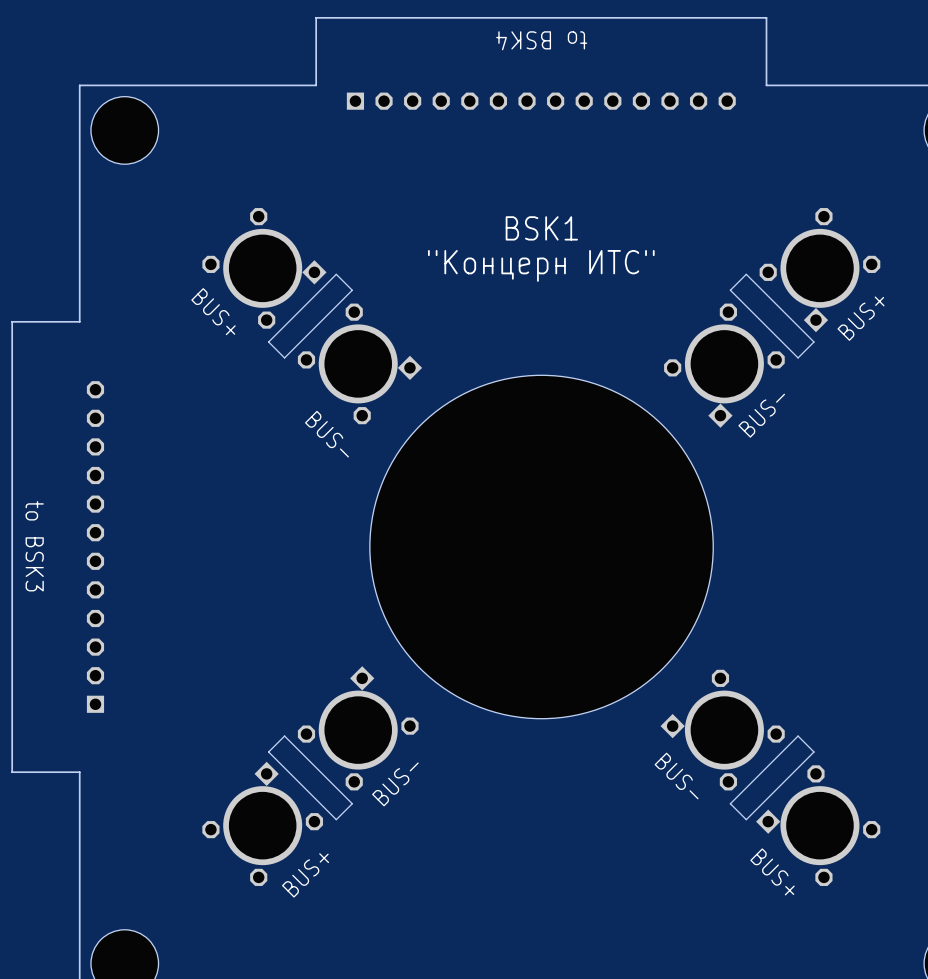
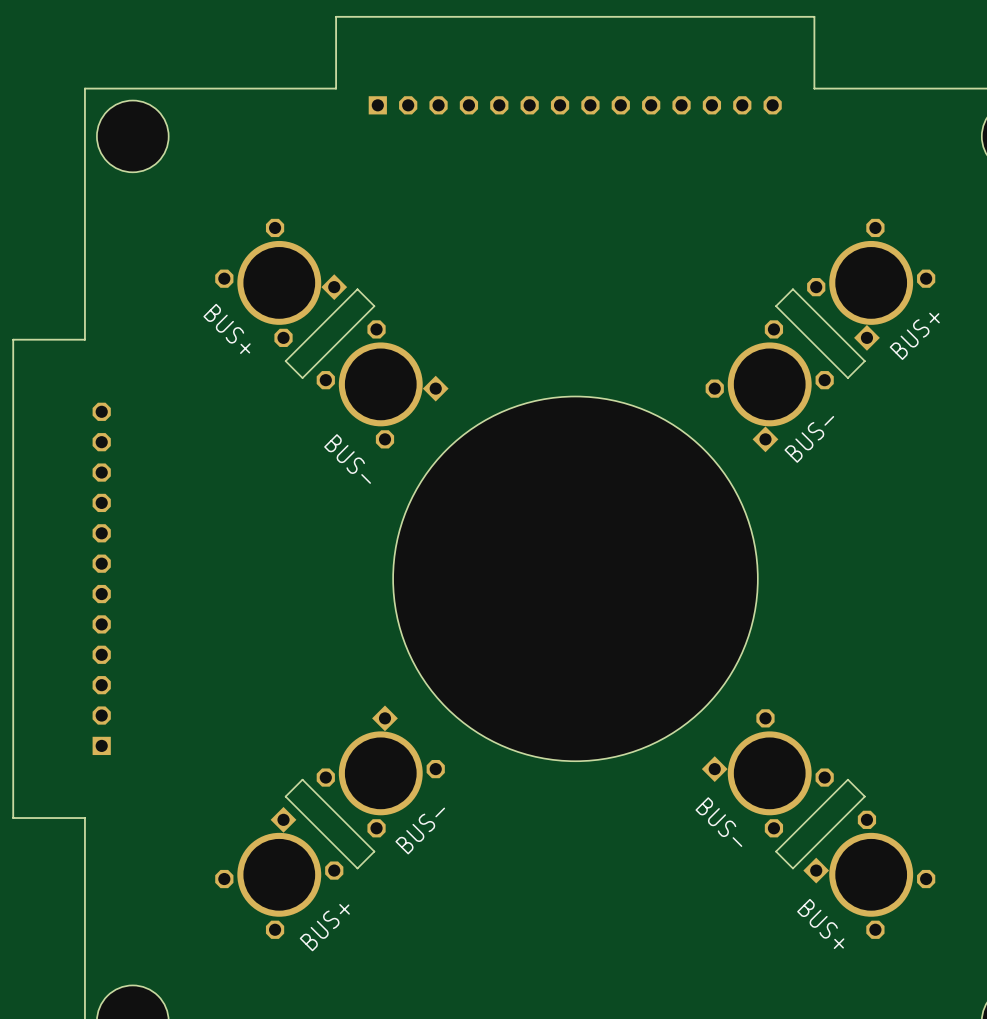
text: to BSK4 (541, 40) -> none
text: BSK1 (541, 228) -> none
text: "Концерн ИТС" (541, 265) -> none
text: to BSK3 (34, 546) -> none

